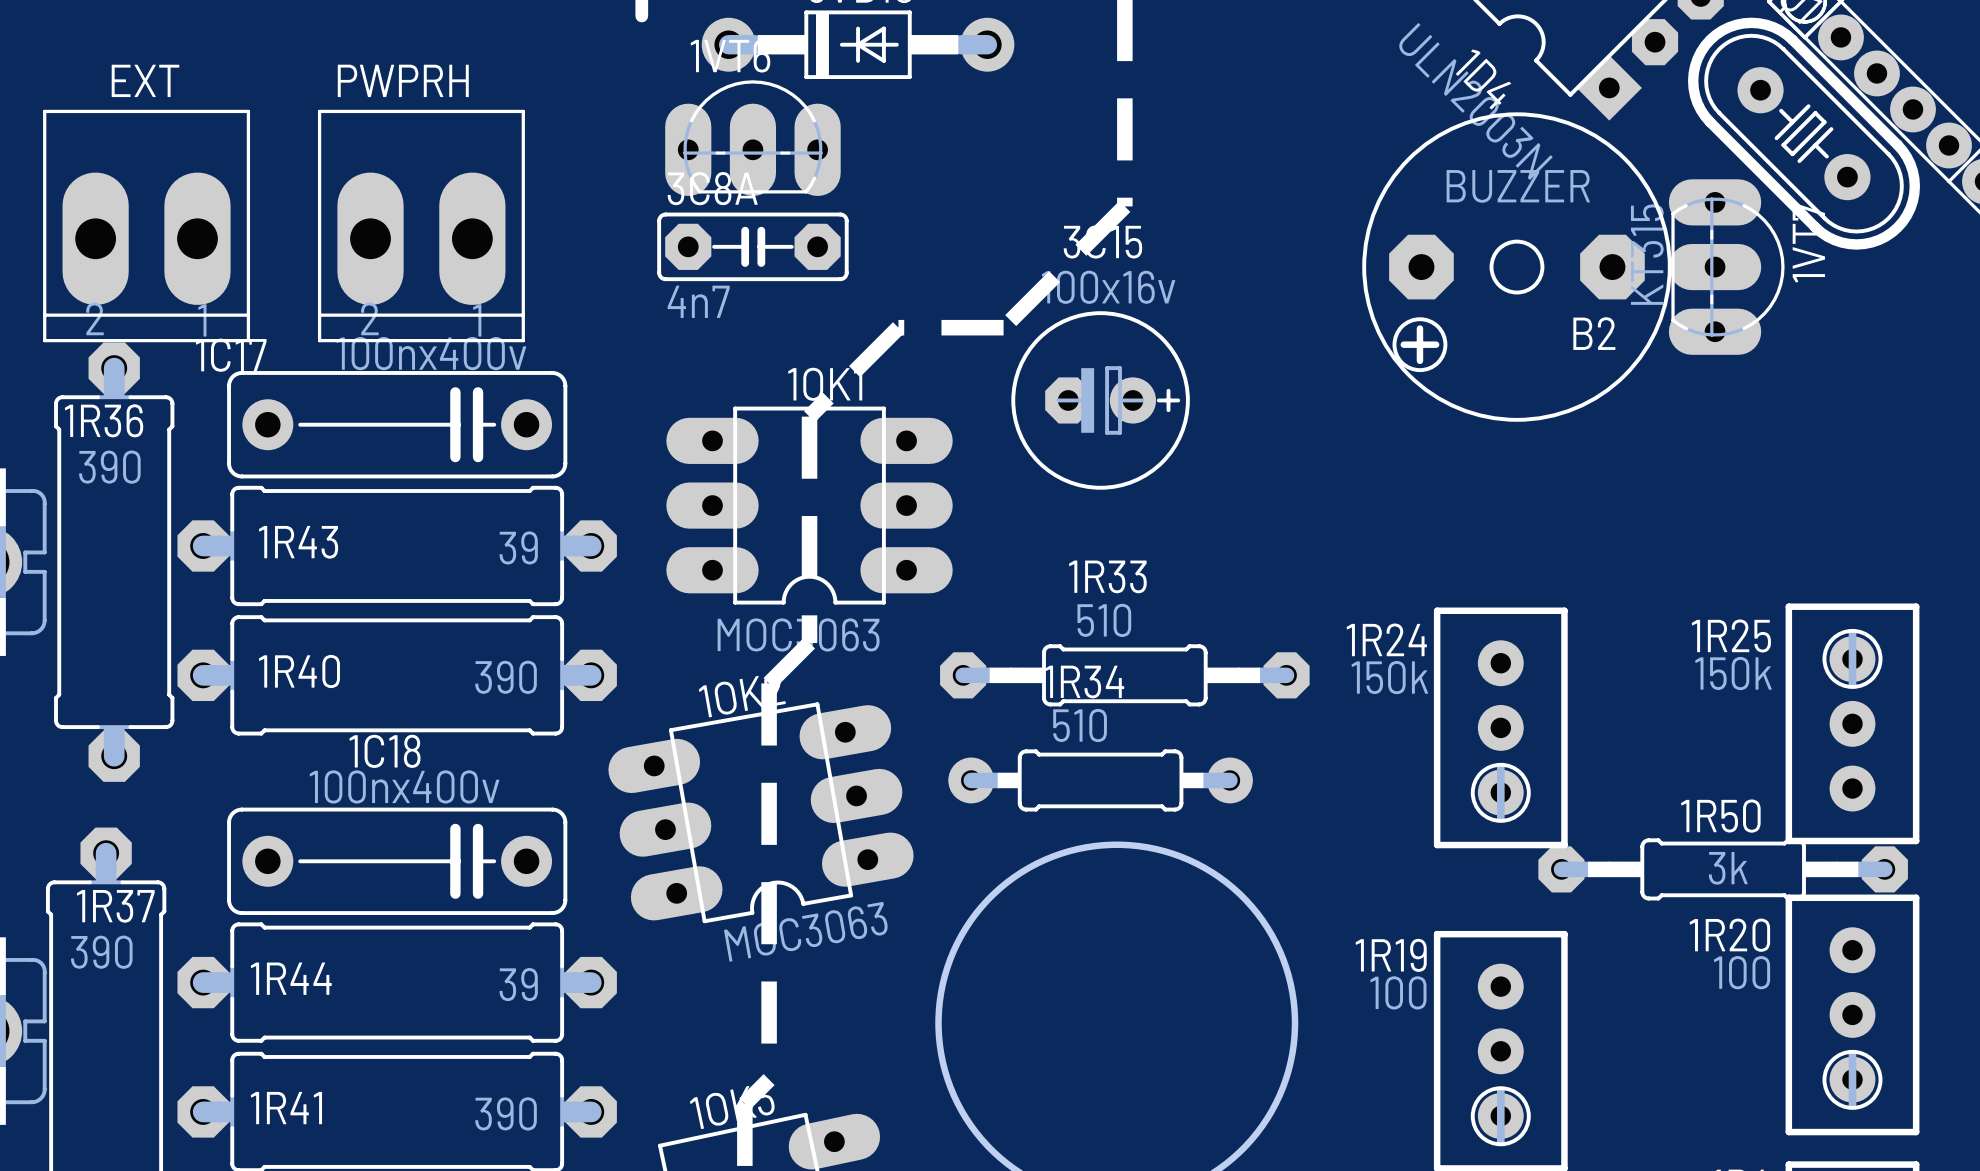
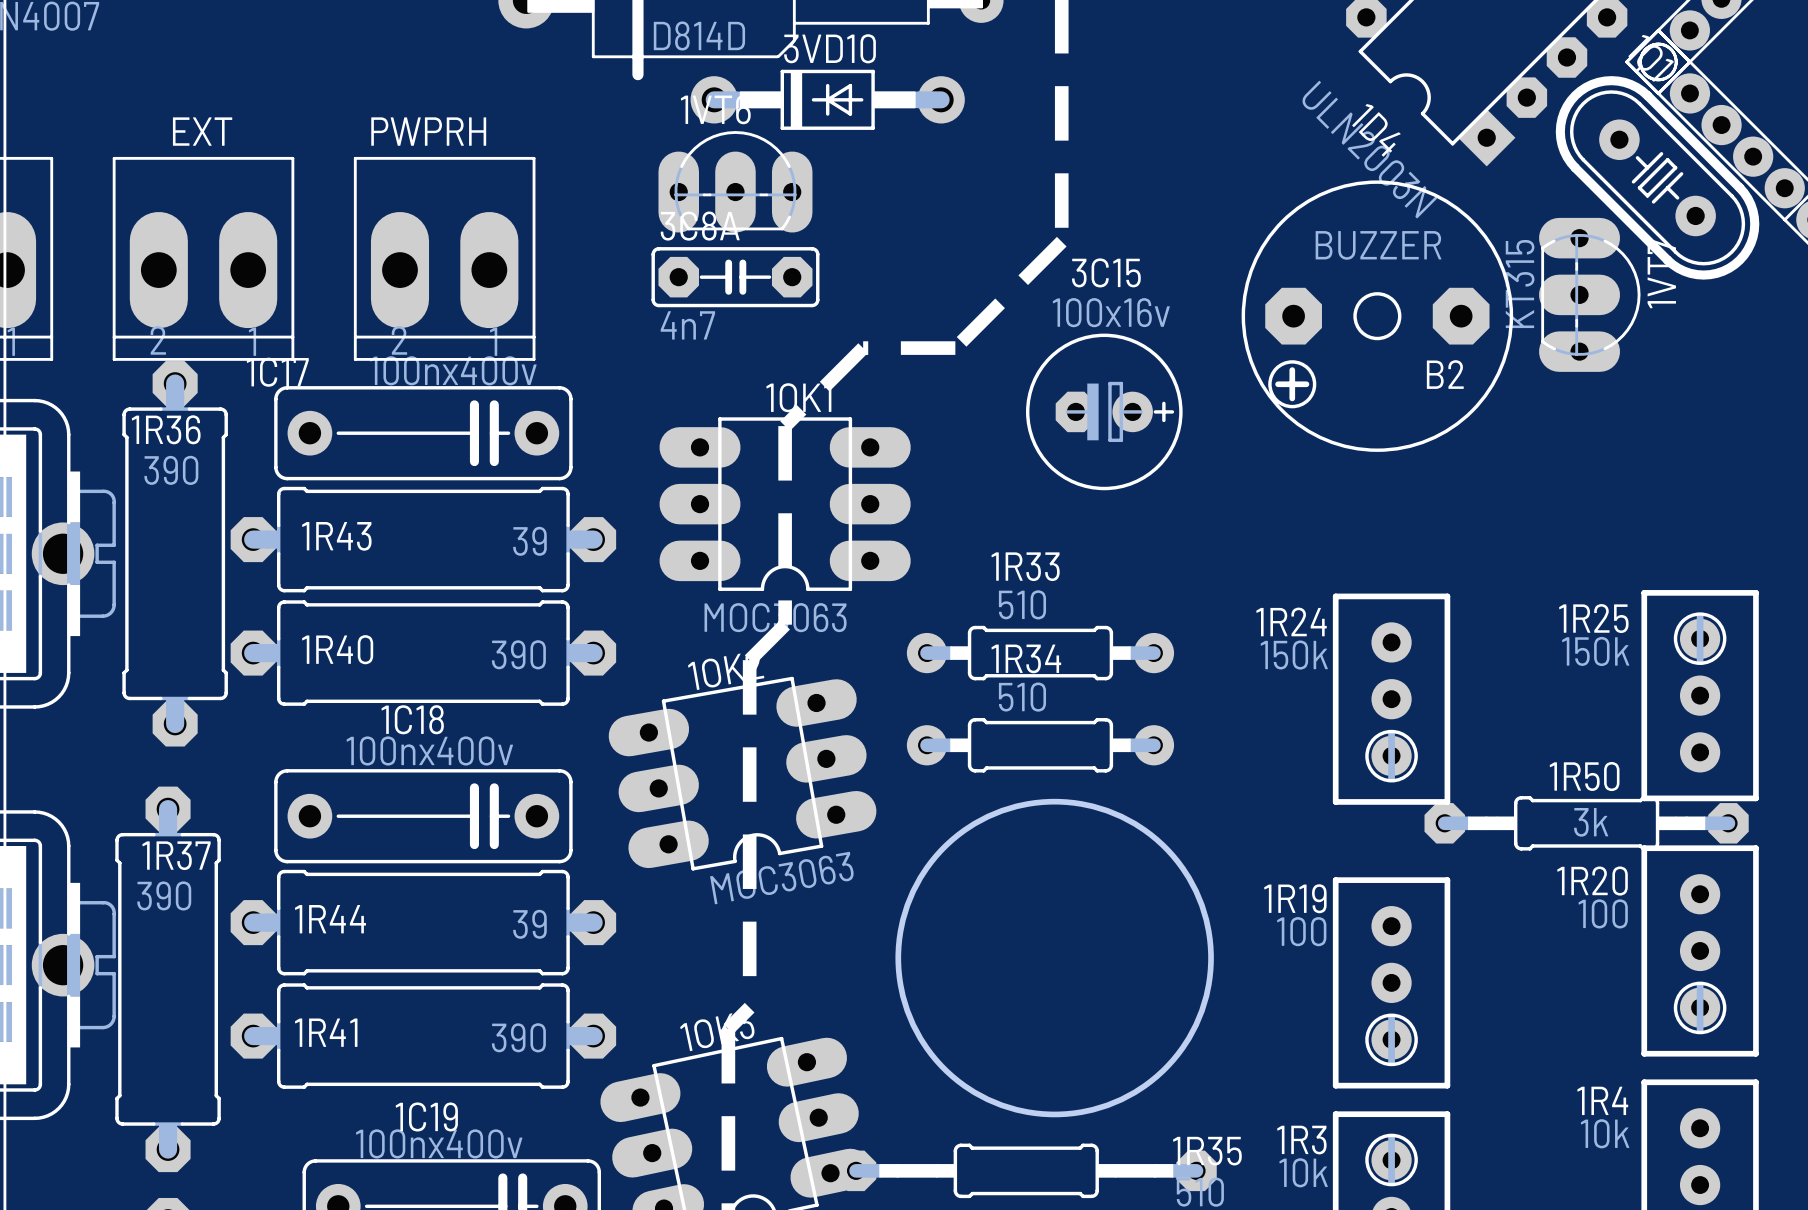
B2 position: (1516, 267) -> (1377, 316)
3C15 position: (1100, 400) -> (1104, 411)
1R33 footprint: [940, 644, 1310, 707] -> [906, 625, 1175, 681]

